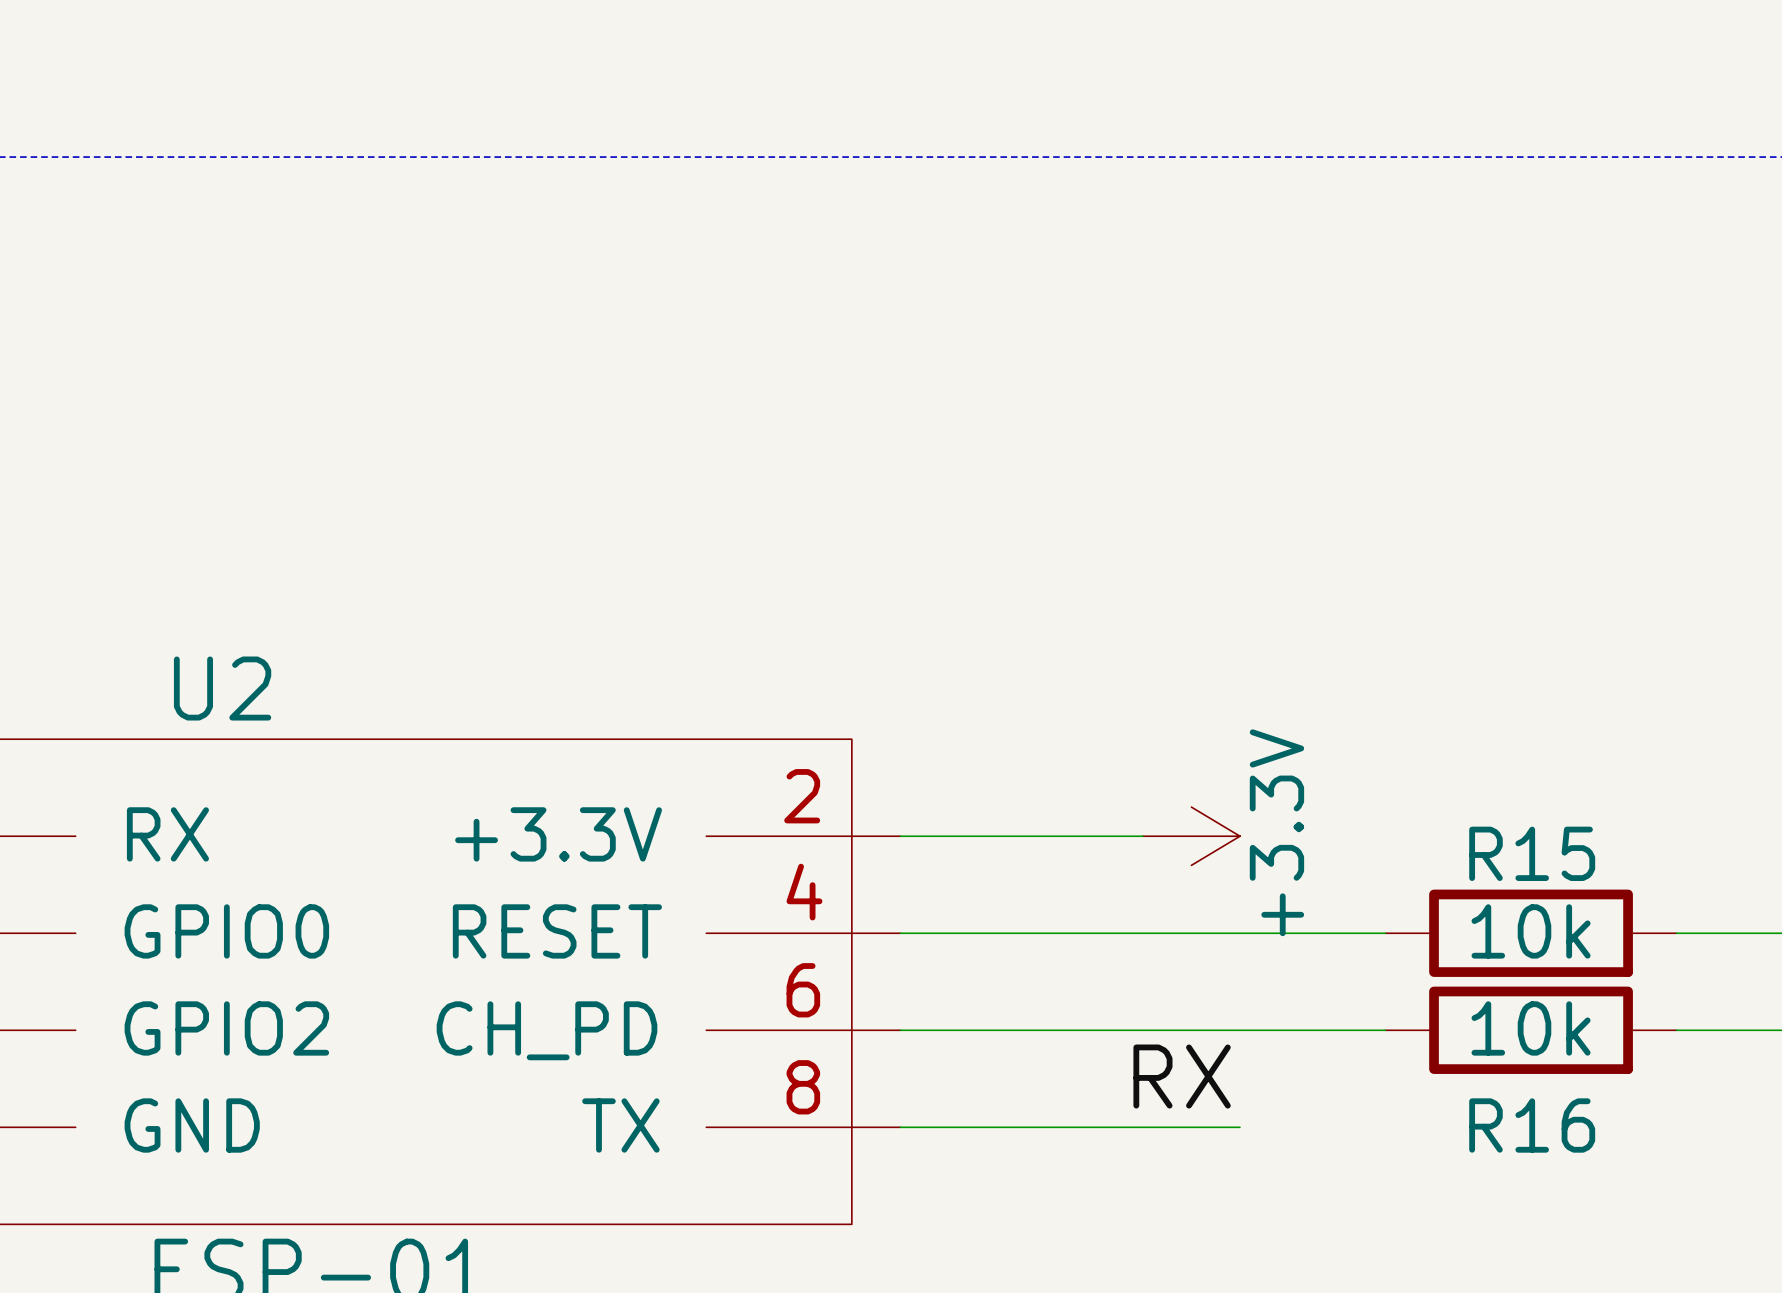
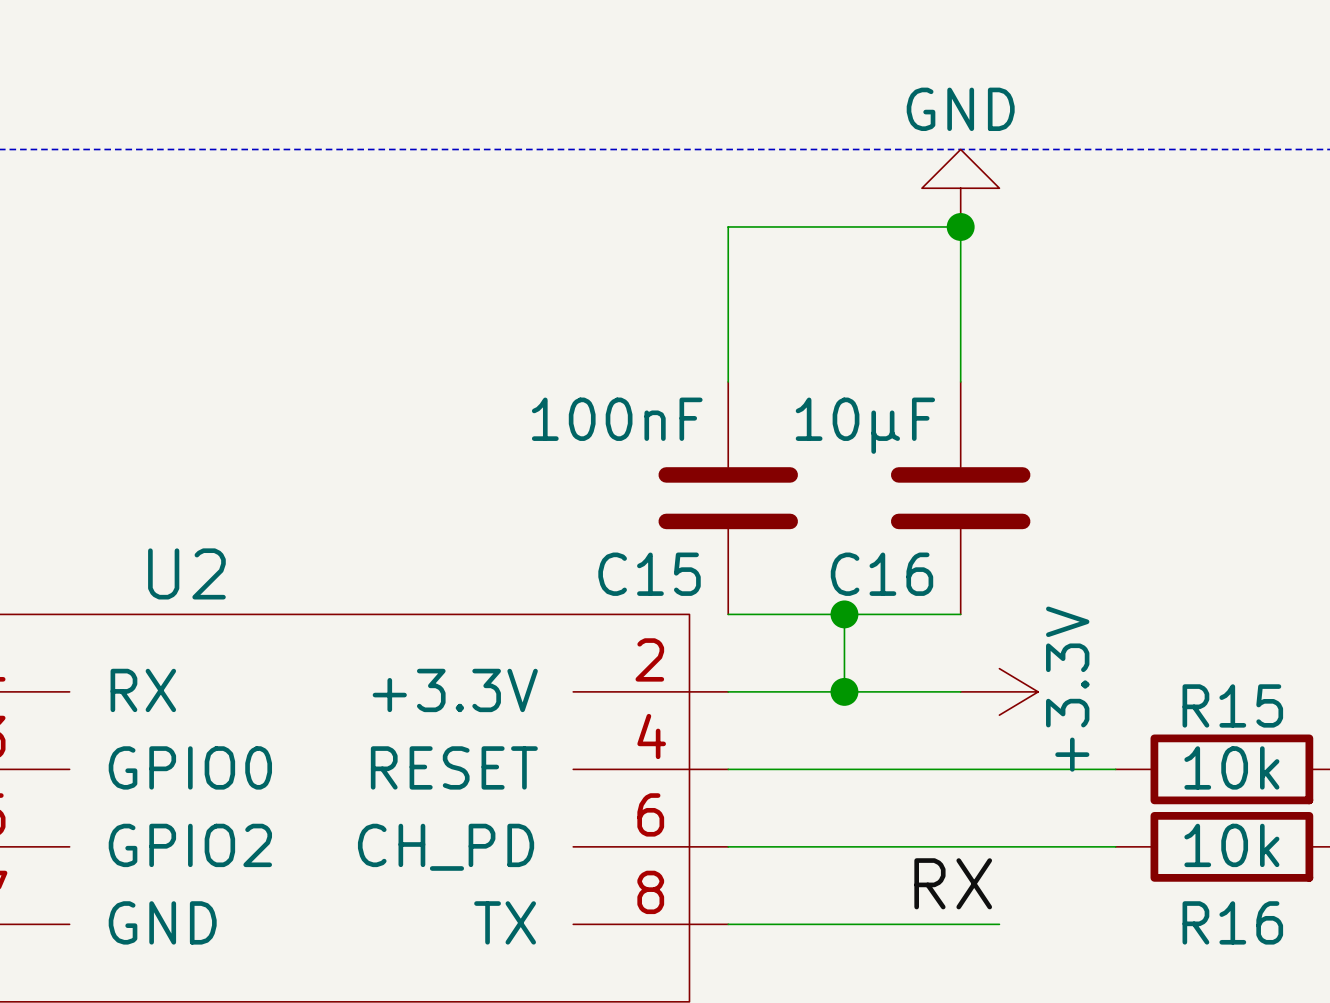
power symbol: none -> GND (960, 188)
junction: none -> (960, 226)
wire: none -> (728, 381) (728, 226) (960, 226) (960, 381)
C15: none -> 100nF (728, 498)
C16: none -> 10µF (960, 498)
wire: none -> (728, 614) (960, 614)
wire: none -> (844, 614) (844, 691)
junction: none -> (844, 614)
junction: none -> (844, 691)
power symbol position: +3.3V (1191, 836) -> +3.3V (999, 691)

